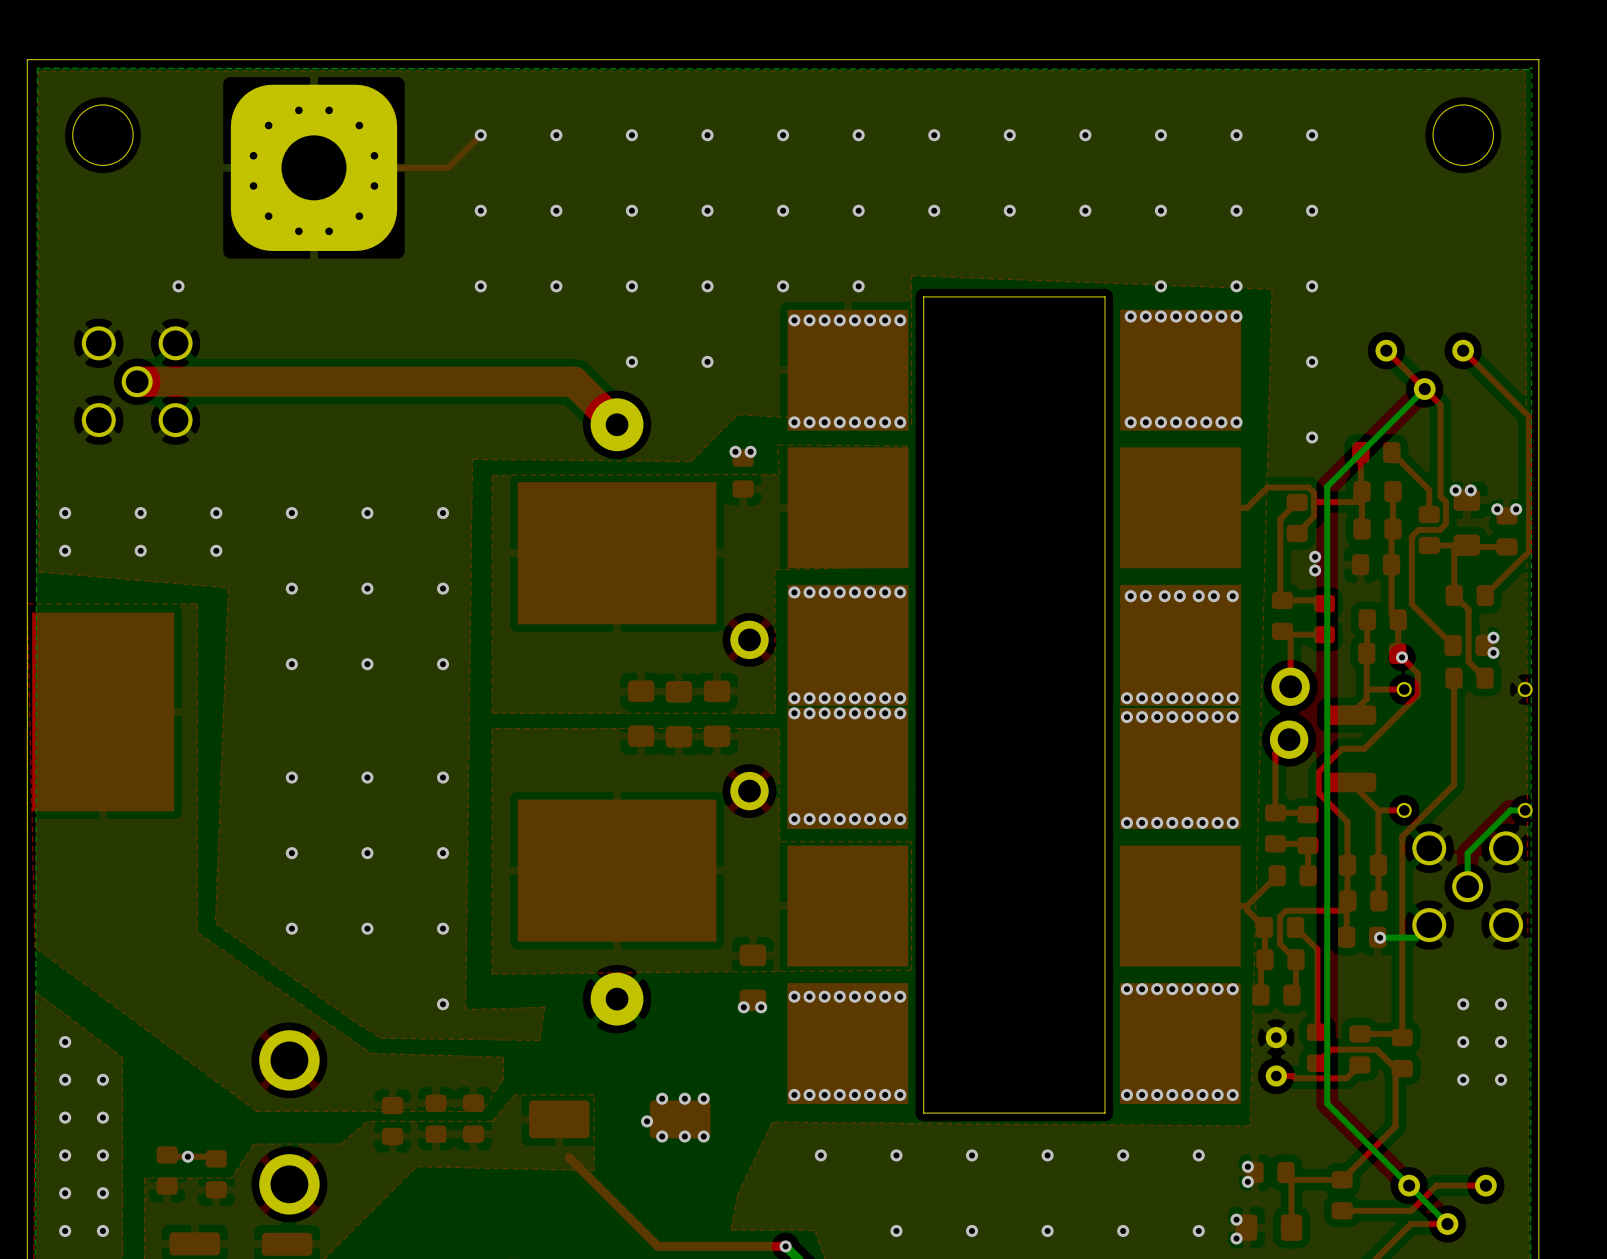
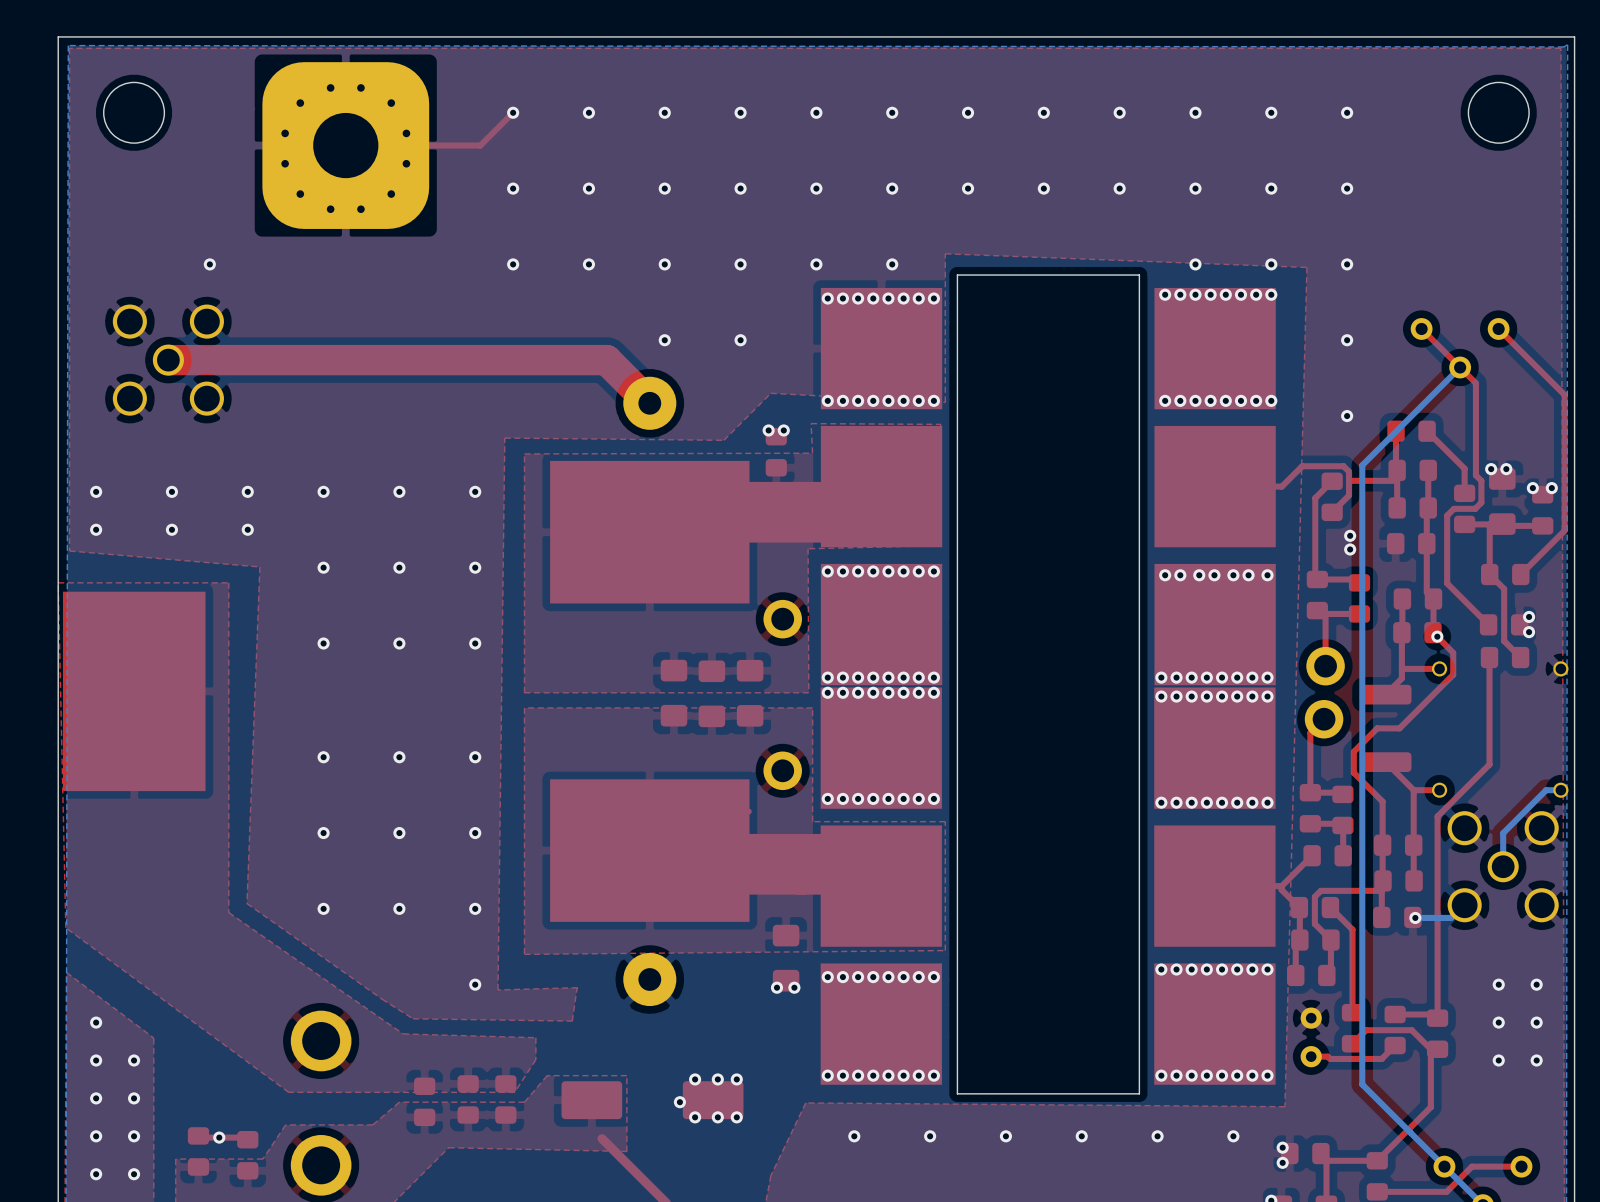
top track: none -> (877, 488) (853, 512) (745, 512) (725, 532) (649, 532)
top track: none -> (649, 850) (717, 850) (730, 864) (855, 864) (873, 882)

